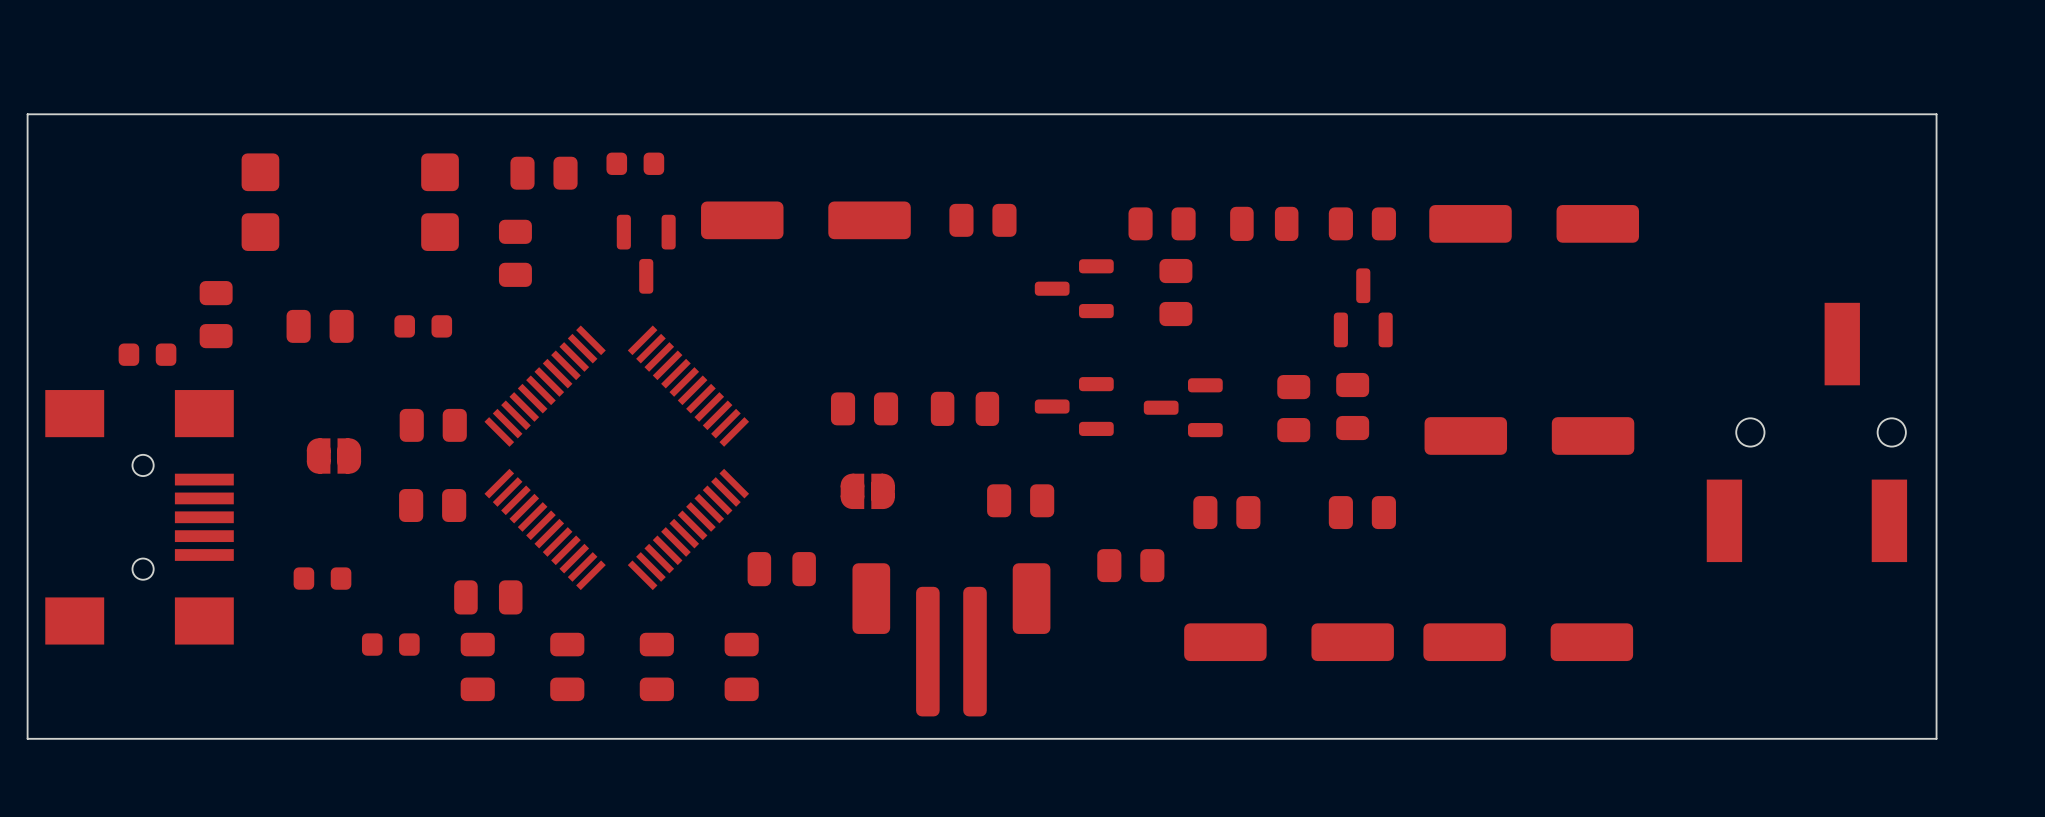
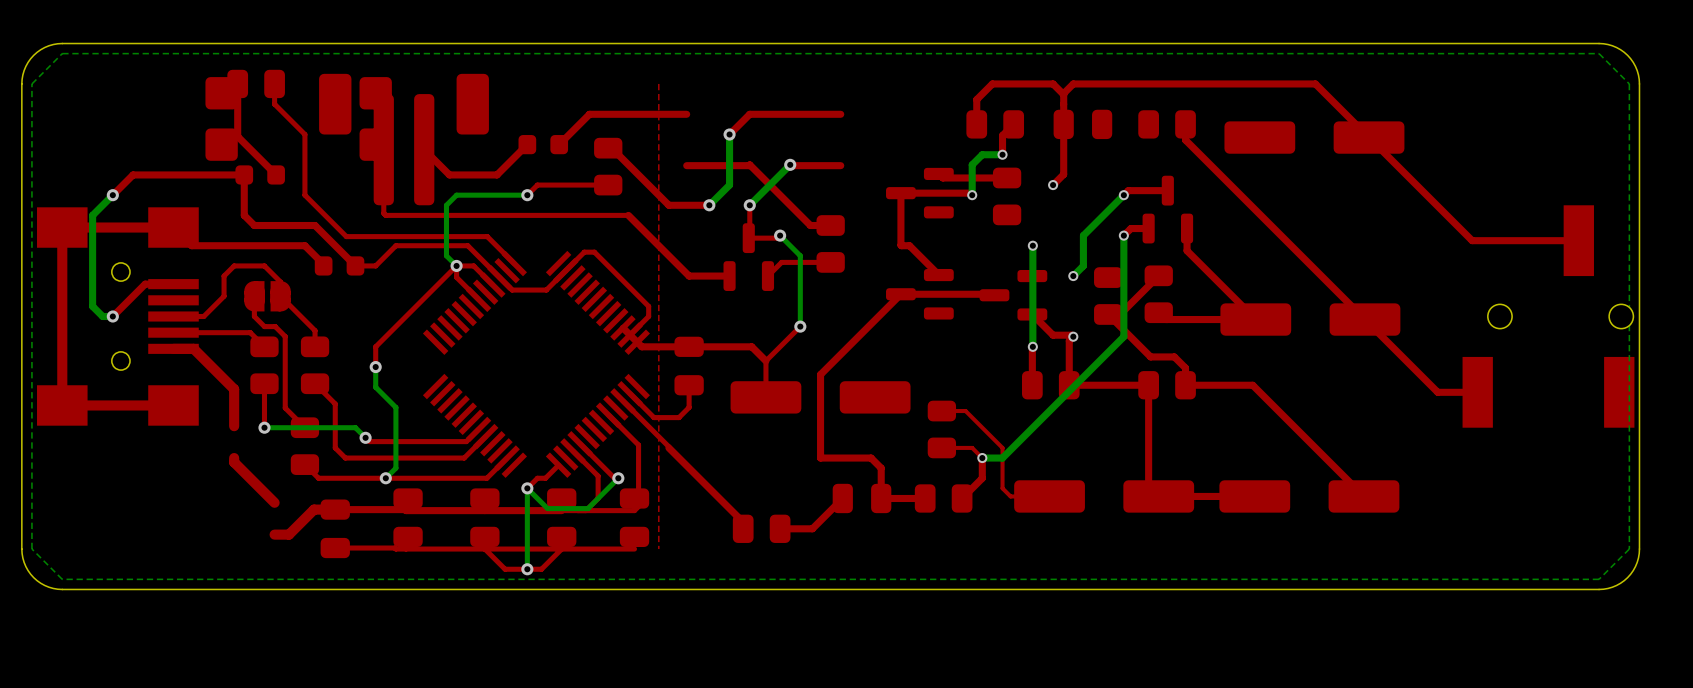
board edge: (74, 114) (27, 114) (27, 161) -> (62, 43) (48, 45) (33, 55) (25, 66) (21, 83)
board edge: (1865, 114) (1936, 114) (1936, 738) (27, 738) (27, 703) -> (1599, 43) (1616, 47) (1627, 55) (1637, 70) (1639, 83) (1639, 549) (1638, 558) (1633, 570) (1624, 580) (1612, 587) (1599, 589) (62, 589) (48, 587) (33, 577) (25, 566) (21, 549)
bottom zone outline: none -> (1599, 53) (62, 53) (31, 83) (31, 549) (62, 579) (1599, 579) (1629, 549) (1629, 83) (1599, 53)
top track: none -> (237, 83) (237, 136) (276, 174)
part: none -> (256, 83)
top track: none -> (274, 83) (274, 104) (304, 134) (304, 195) (346, 236) (487, 236) (514, 263)
top zone outline: none -> (658, 83) (658, 549)
part position: (635, 163) -> (543, 144)
part: (544, 173) -> none
top track: none -> (1063, 94) (1073, 83) (1315, 83) (1472, 240) (1568, 240)
top track: none -> (686, 114) (589, 114) (559, 144)
top track: none -> (840, 114) (749, 114) (729, 134)
top track: none -> (976, 124) (976, 99) (992, 83) (1053, 83) (1063, 94) (1063, 174) (1053, 185)
top track: none -> (1013, 124) (1002, 135) (1002, 154)
top track: none -> (1185, 124) (1185, 140) (1437, 392) (1467, 392)
part position: (805, 220) -> (820, 397)
bottom track: none -> (729, 134) (729, 185) (709, 205)
via: none -> (729, 134)
part: (982, 220) -> none
part position: (1162, 223) -> (995, 124)
part position: (1264, 223) -> (1082, 124)
part position: (1362, 223) -> (1167, 124)
part: none -> (404, 139)
top track: none -> (527, 144) (497, 174) (449, 174) (424, 149)
top track: none -> (608, 148) (611, 148) (668, 205) (709, 205)
top track: none -> (383, 149) (383, 213) (385, 215) (628, 215) (689, 276) (729, 276)
bottom track: none -> (1002, 154) (982, 154) (972, 164) (972, 195)
via: none -> (1002, 154)
part: (515, 253) -> none
part rotation: 0° (646, 254) -> 180° (748, 257)
part position: (646, 254) -> (748, 257)
top track: none -> (790, 164) (840, 165)
bottom track: none -> (790, 164) (749, 205)
via: none -> (790, 164)
top track: none -> (686, 165) (749, 164) (810, 225) (830, 225)
part: none -> (608, 166)
top track: none -> (938, 173) (942, 177) (1007, 177)
part: none -> (260, 174)
top track: none -> (608, 185) (537, 185) (527, 195)
via: none -> (1053, 185)
top track: none -> (1167, 190) (1128, 190) (1123, 195)
top track: none -> (112, 195) (133, 174) (244, 174) (244, 215) (254, 225) (315, 225) (355, 265) (375, 265) (395, 245) (467, 245) (512, 290) (546, 290) (584, 252) (594, 252) (648, 306) (648, 316) (630, 335)
bottom track: none -> (112, 195) (92, 215) (92, 306) (102, 316) (112, 316)
via: none -> (112, 195)
bottom track: none -> (527, 195) (456, 195) (446, 205) (446, 255) (456, 265)
via: none -> (527, 195)
top track: none -> (972, 195) (970, 193) (900, 193) (900, 245) (909, 245) (938, 275)
via: none -> (972, 195)
bottom track: none -> (1123, 195) (1083, 235) (1083, 265) (1073, 276)
via: none -> (1123, 195)
via: none -> (709, 205)
top track: none -> (749, 205) (748, 238) (777, 238) (780, 235)
via: none -> (749, 205)
part: (216, 314) -> none
part: (320, 326) -> none
part position: (423, 326) -> (339, 265)
top track: none -> (1148, 228) (1130, 228) (1123, 235)
top track: none -> (1187, 228) (1187, 250) (1255, 319) (1165, 319) (1158, 312)
bottom track: none -> (780, 235) (800, 255) (800, 326)
via: none -> (780, 235)
bottom track: none -> (1123, 235) (1123, 336) (1002, 458) (982, 458)
via: none -> (1123, 235)
part: none -> (830, 243)
bottom track: none -> (1032, 245) (1032, 346)
via: none -> (1032, 245)
part: (147, 354) -> none
top track: none -> (830, 262) (781, 262) (767, 276)
top track: none -> (323, 265) (304, 245) (191, 245) (173, 227) (62, 227) (62, 405) (173, 405)
top track: none -> (456, 265) (473, 265) (492, 285)
top track: none -> (456, 265) (375, 346) (375, 367)
top track: none -> (456, 265) (456, 277) (478, 299)
via: none -> (456, 265)
via: none -> (1073, 276)
top track: none -> (1158, 275) (1120, 314) (1108, 314) (1150, 356) (1174, 356) (1185, 368) (1185, 385) (1252, 385) (1363, 496)
top track: none -> (173, 284) (145, 284) (112, 316)
top track: none -> (994, 295) (900, 294) (820, 374) (820, 458) (871, 458) (881, 468) (881, 498) (925, 498)
top track: none -> (254, 296) (254, 316) (264, 326) (275, 326) (285, 336) (285, 408) (304, 427)
part: (864, 408) -> none
part: (964, 408) -> none
part: (433, 425) -> none
via: none -> (112, 316)
top track: none -> (173, 316) (203, 316) (224, 296) (224, 276) (234, 265) (264, 265) (280, 282) (280, 296) (315, 330) (315, 346)
top track: none -> (1032, 317) (1032, 314) (1053, 335) (1073, 336) (1069, 340) (1069, 385) (1148, 385) (1148, 486) (1158, 496) (1254, 496)
top track: none -> (800, 326) (765, 360)
via: none -> (800, 326)
top track: none -> (623, 328) (641, 346) (751, 346) (765, 360)
top track: none -> (173, 332) (250, 332) (264, 346)
part position: (333, 456) -> (267, 296)
via: none -> (1073, 336)
part position: (616, 457) -> (536, 364)
top track: none -> (1032, 346) (1032, 385)
via: none -> (1032, 346)
top track: none -> (173, 348) (193, 348) (234, 389) (234, 426)
top track: none -> (765, 360) (765, 397)
part: none -> (264, 365)
part: none -> (315, 365)
bottom track: none -> (375, 367) (375, 387) (395, 407) (395, 468) (385, 478)
via: none -> (375, 367)
part: (867, 491) -> none
part: (1020, 500) -> none
part: (432, 505) -> none
top track: none -> (264, 383) (264, 427)
top track: none -> (315, 383) (335, 403) (335, 447) (345, 458) (464, 458) (485, 436)
top track: none -> (689, 385) (689, 407) (679, 417) (654, 417) (630, 393)
part position: (139, 517) -> (117, 316)
top track: none -> (622, 400) (668, 447) (743, 522) (743, 528) (743, 521)
top track: none -> (941, 411) (965, 411) (1002, 447) (1002, 488) (1010, 496) (1049, 496)
top track: none -> (608, 415) (638, 445) (638, 506) (634, 510) (335, 509)
bottom track: none -> (264, 427) (355, 427) (365, 437)
via: none -> (264, 427)
top track: none -> (478, 429) (466, 441) (369, 441) (365, 437)
part rotation: 0° (1130, 565) -> 90° clockwise (941, 429)
part rotation: 0° (781, 569) -> 90° clockwise (689, 366)
part position: (781, 569) -> (689, 366)
via: none -> (365, 437)
part: (322, 578) -> none
top track: none -> (580, 443) (614, 478) (618, 478)
part: none -> (304, 446)
top track: none -> (941, 447) (972, 447) (982, 458) (982, 478) (962, 498)
top track: none -> (572, 450) (598, 476) (598, 498) (585, 510)
top track: none -> (234, 458) (234, 462) (274, 502)
part rotation: 0° (488, 597) -> 90° clockwise (335, 528)
part position: (488, 597) -> (335, 528)
top track: none -> (507, 458) (486, 478) (318, 478) (304, 464)
via: none -> (982, 458)
top track: none -> (558, 465) (545, 478) (537, 478) (527, 488)
via: none -> (385, 478)
bottom track: none -> (618, 478) (588, 508) (547, 508) (527, 488) (527, 569)
via: none -> (618, 478)
via: none -> (527, 488)
part: (951, 639) -> none
part: (390, 644) -> none
top track: none -> (842, 498) (812, 528) (780, 528)
part: none -> (862, 498)
part: none -> (943, 498)
top track: none -> (335, 509) (314, 509) (289, 534) (274, 534)
part: none -> (761, 528)
top track: none -> (335, 548) (634, 549)
top track: none -> (561, 549) (541, 569) (505, 569) (484, 549)
via: none -> (527, 569)

